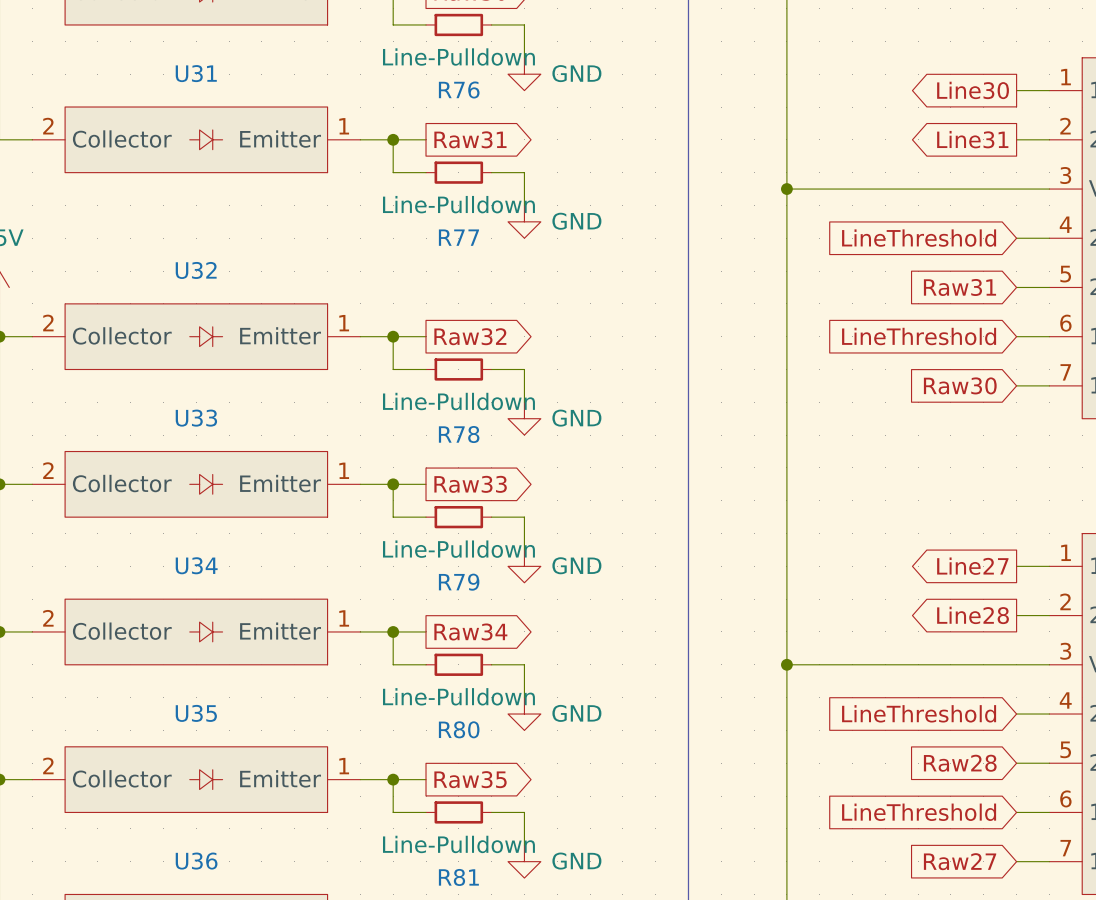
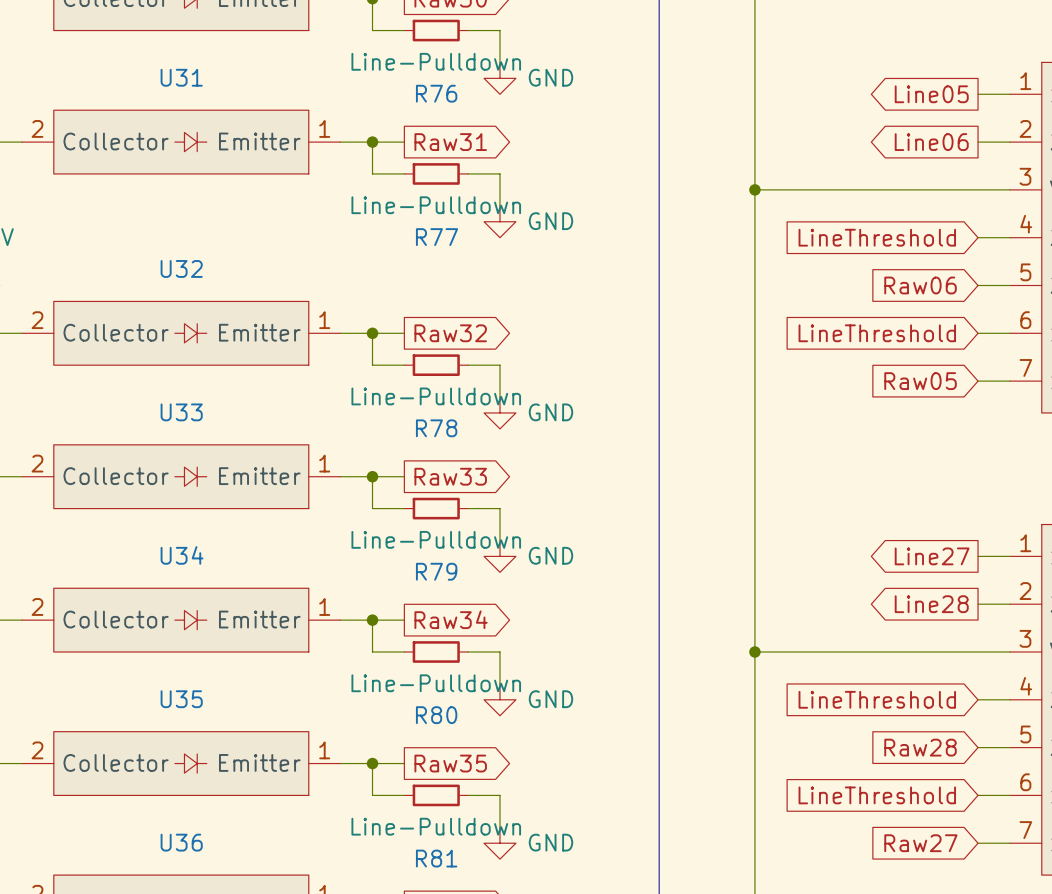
global label: Line30 (973, 90) -> Line05 (931, 94)
global label: Line31 (972, 139) -> Line06 (931, 142)
global label: Raw31 (959, 287) -> Raw06 (920, 285)
global label: Raw30 (960, 385) -> Raw05 (920, 381)

